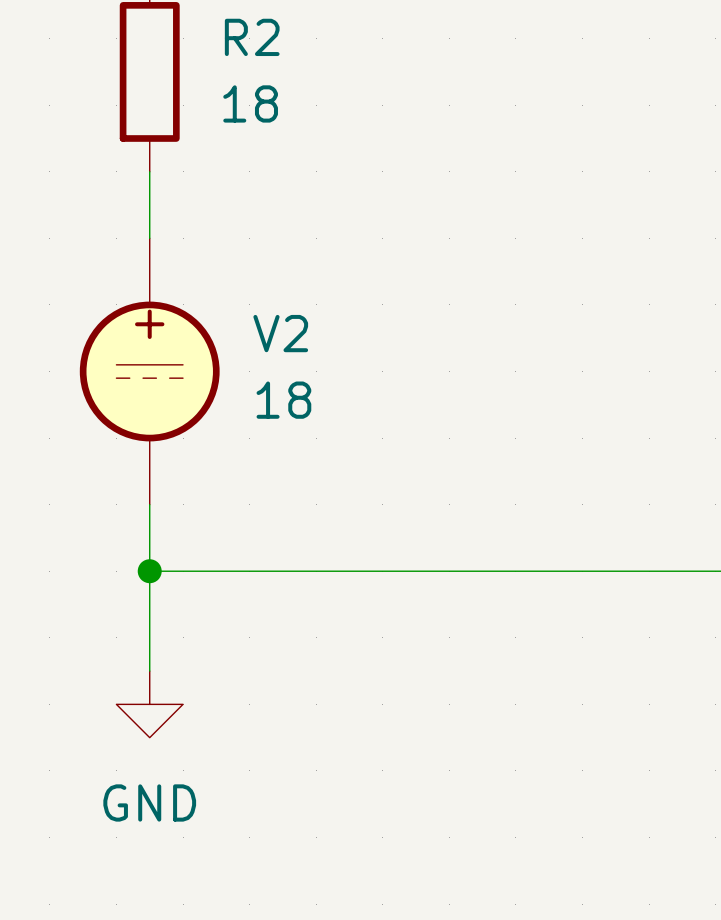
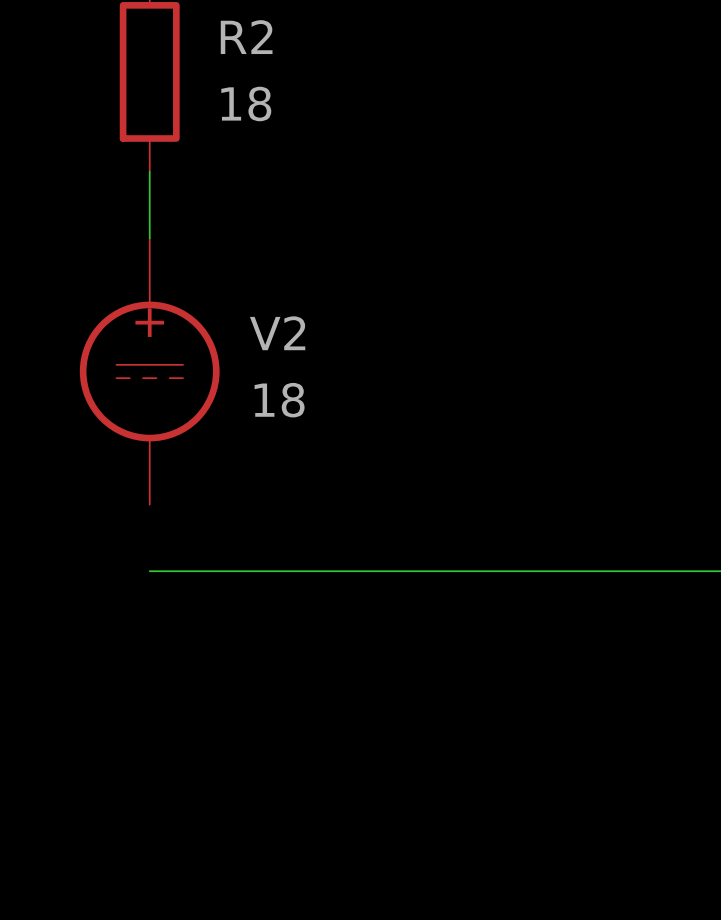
wire: (149, 504) (149, 671) -> none
junction: (149, 571) -> none
power symbol: GND (149, 704) -> none

